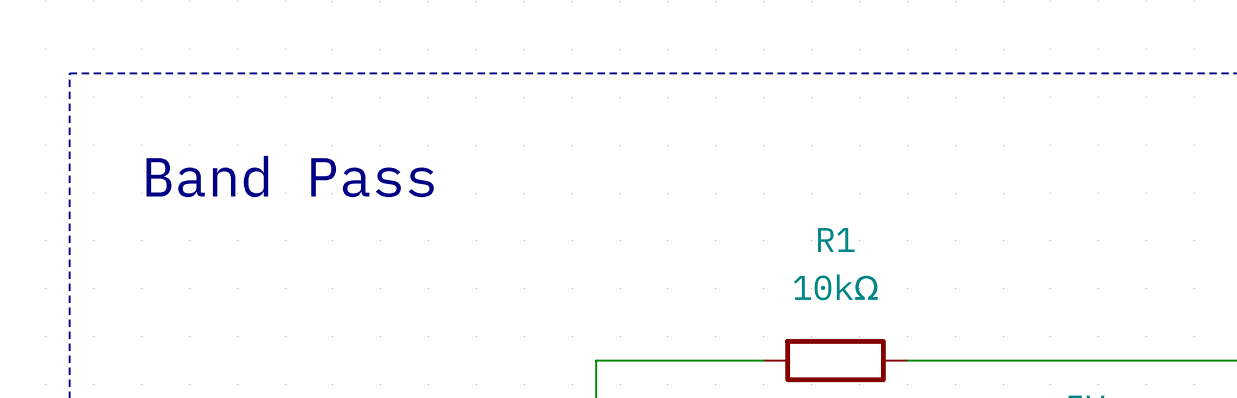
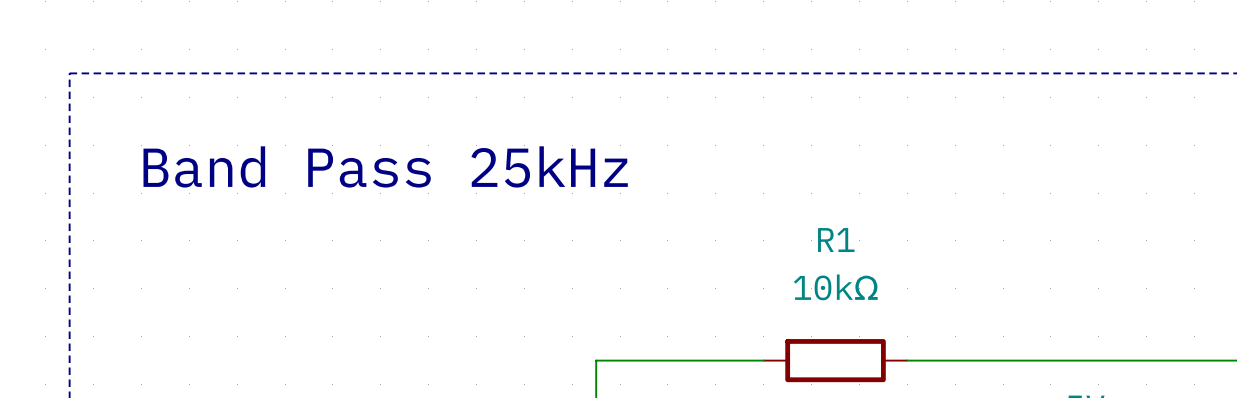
text: Band Pass (290, 176) -> Band Pass 25kHz (385, 166)

